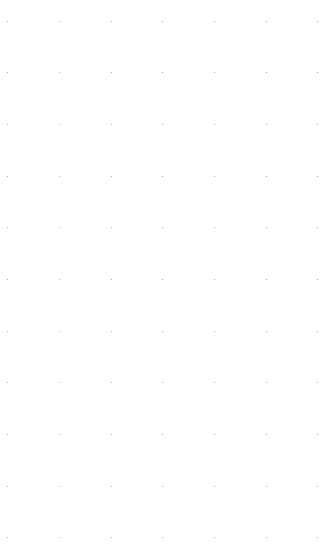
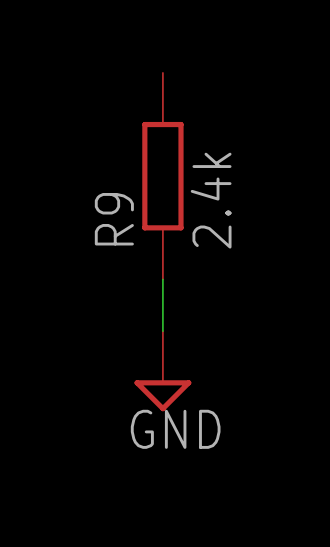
R9: none -> 2.4k (162, 176)
wire: none -> (162, 279) (162, 331)
power symbol: none -> GND (162, 371)

